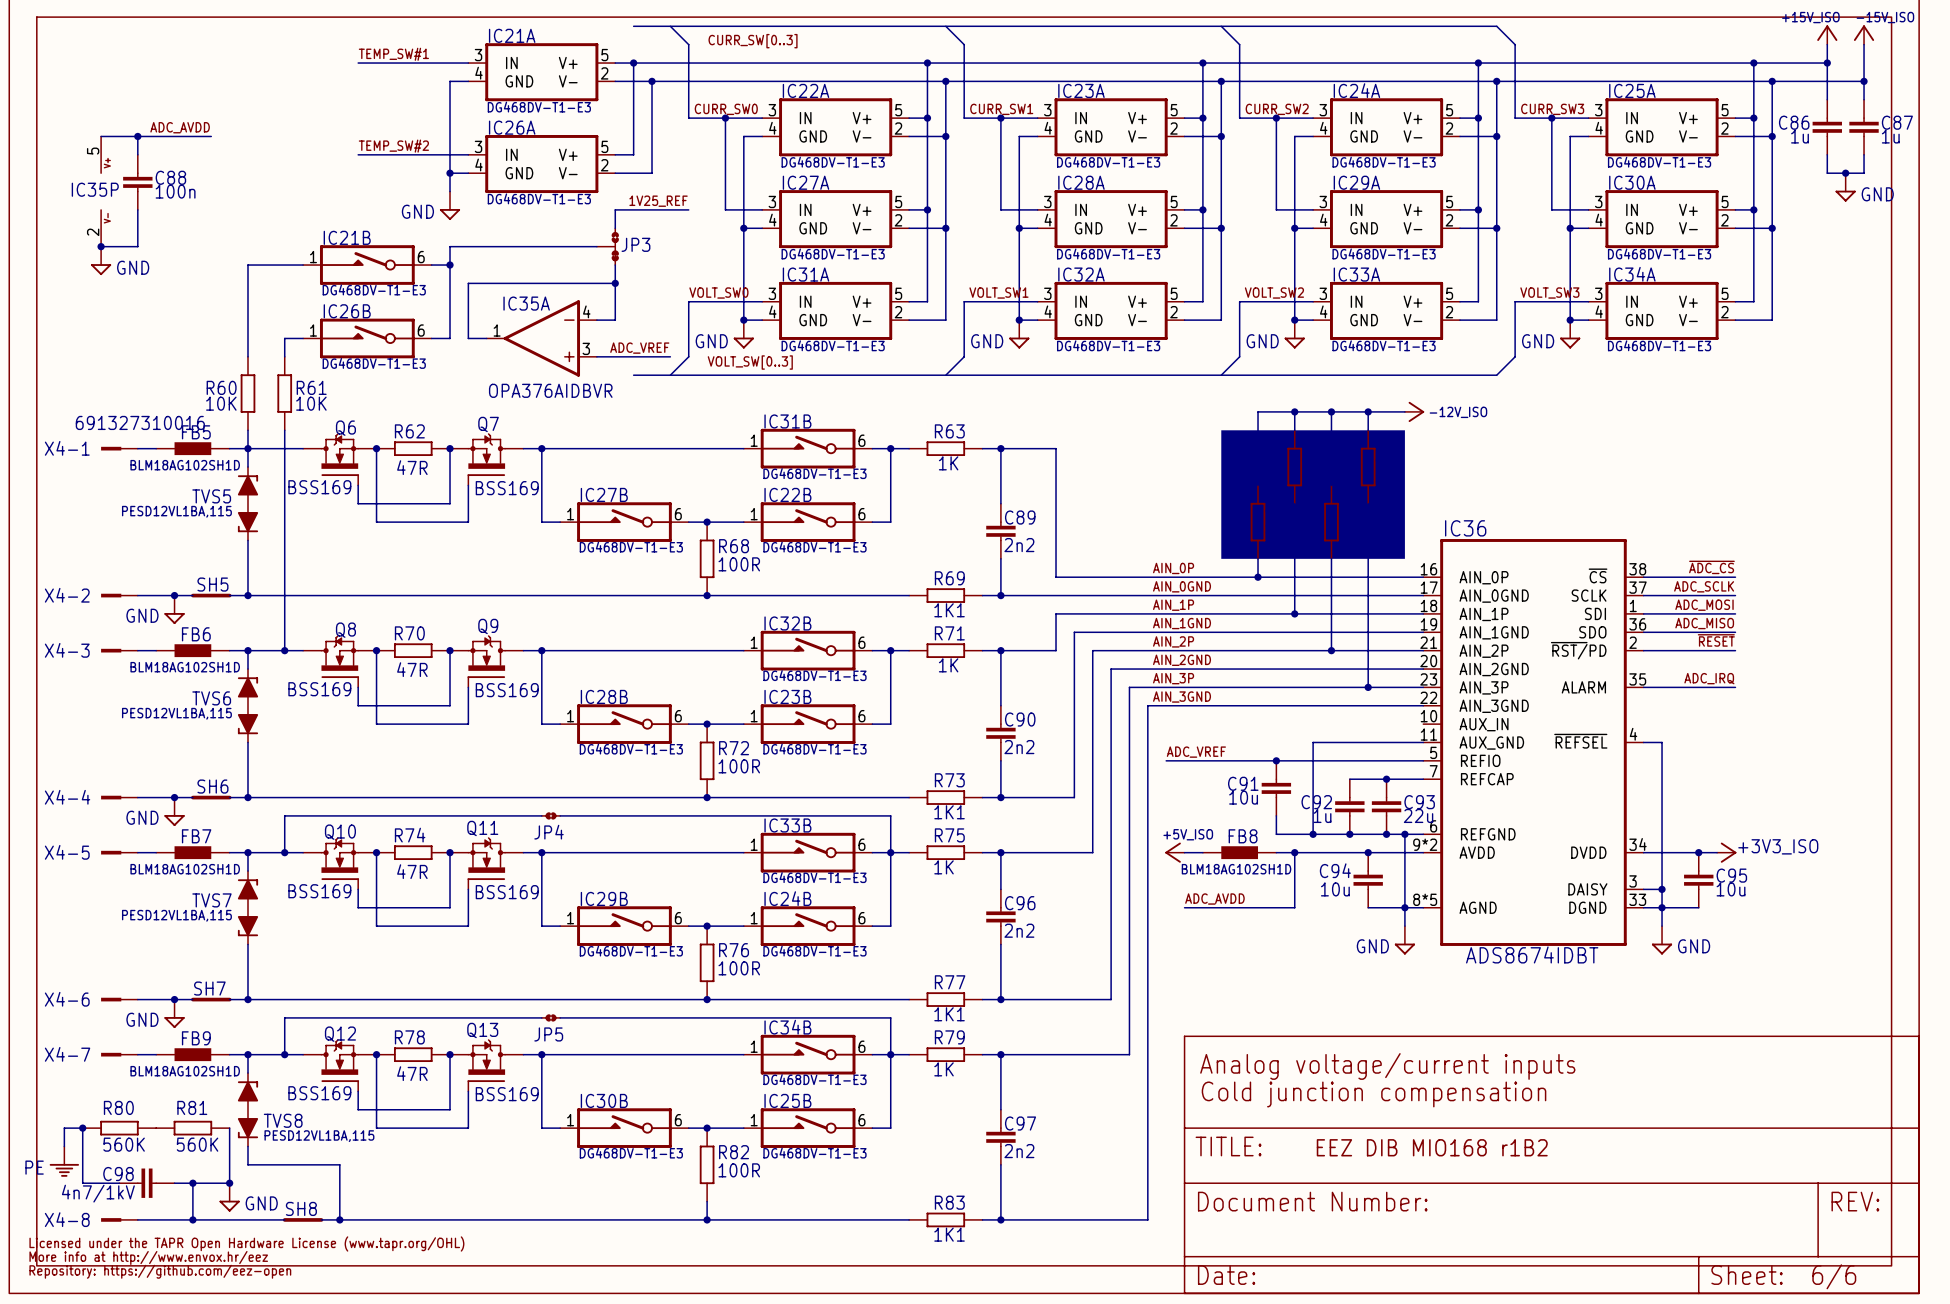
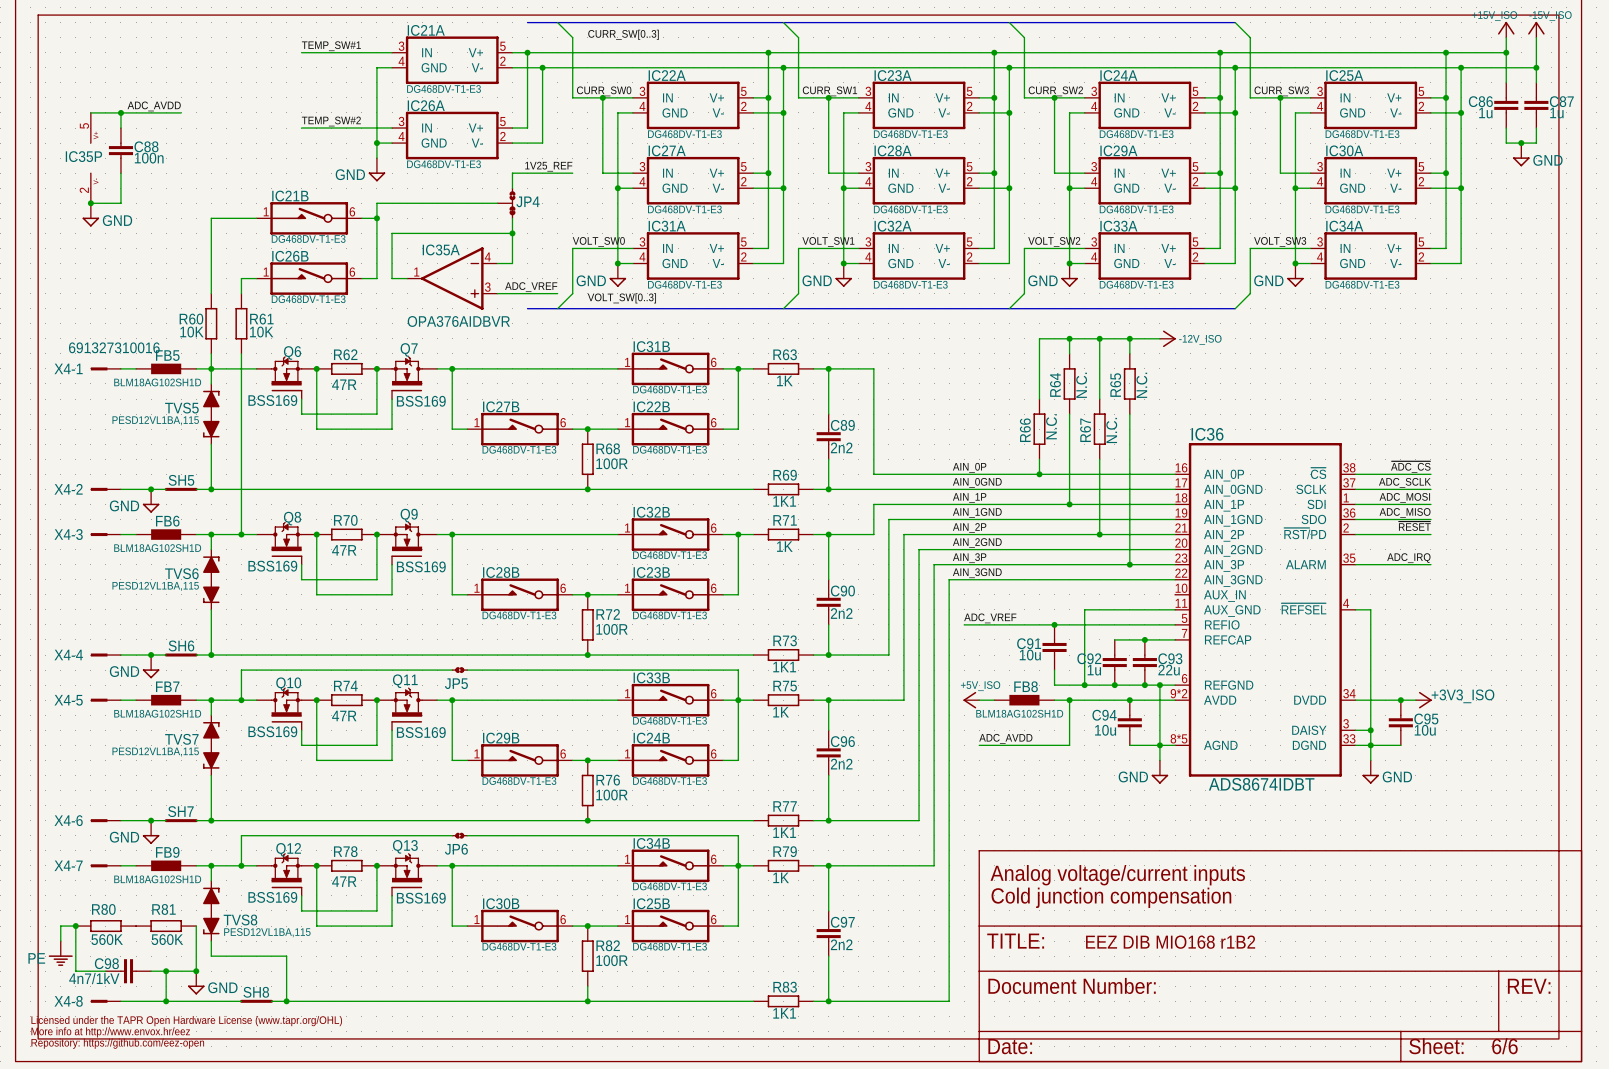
JP3 name: JP3 (635, 244) -> JP4 (528, 201)
drawing: [1221, 430, 1405, 559] -> none
JP4 name: JP4 (549, 832) -> JP5 (456, 683)
JP5 name: JP5 (548, 1034) -> JP6 (456, 849)

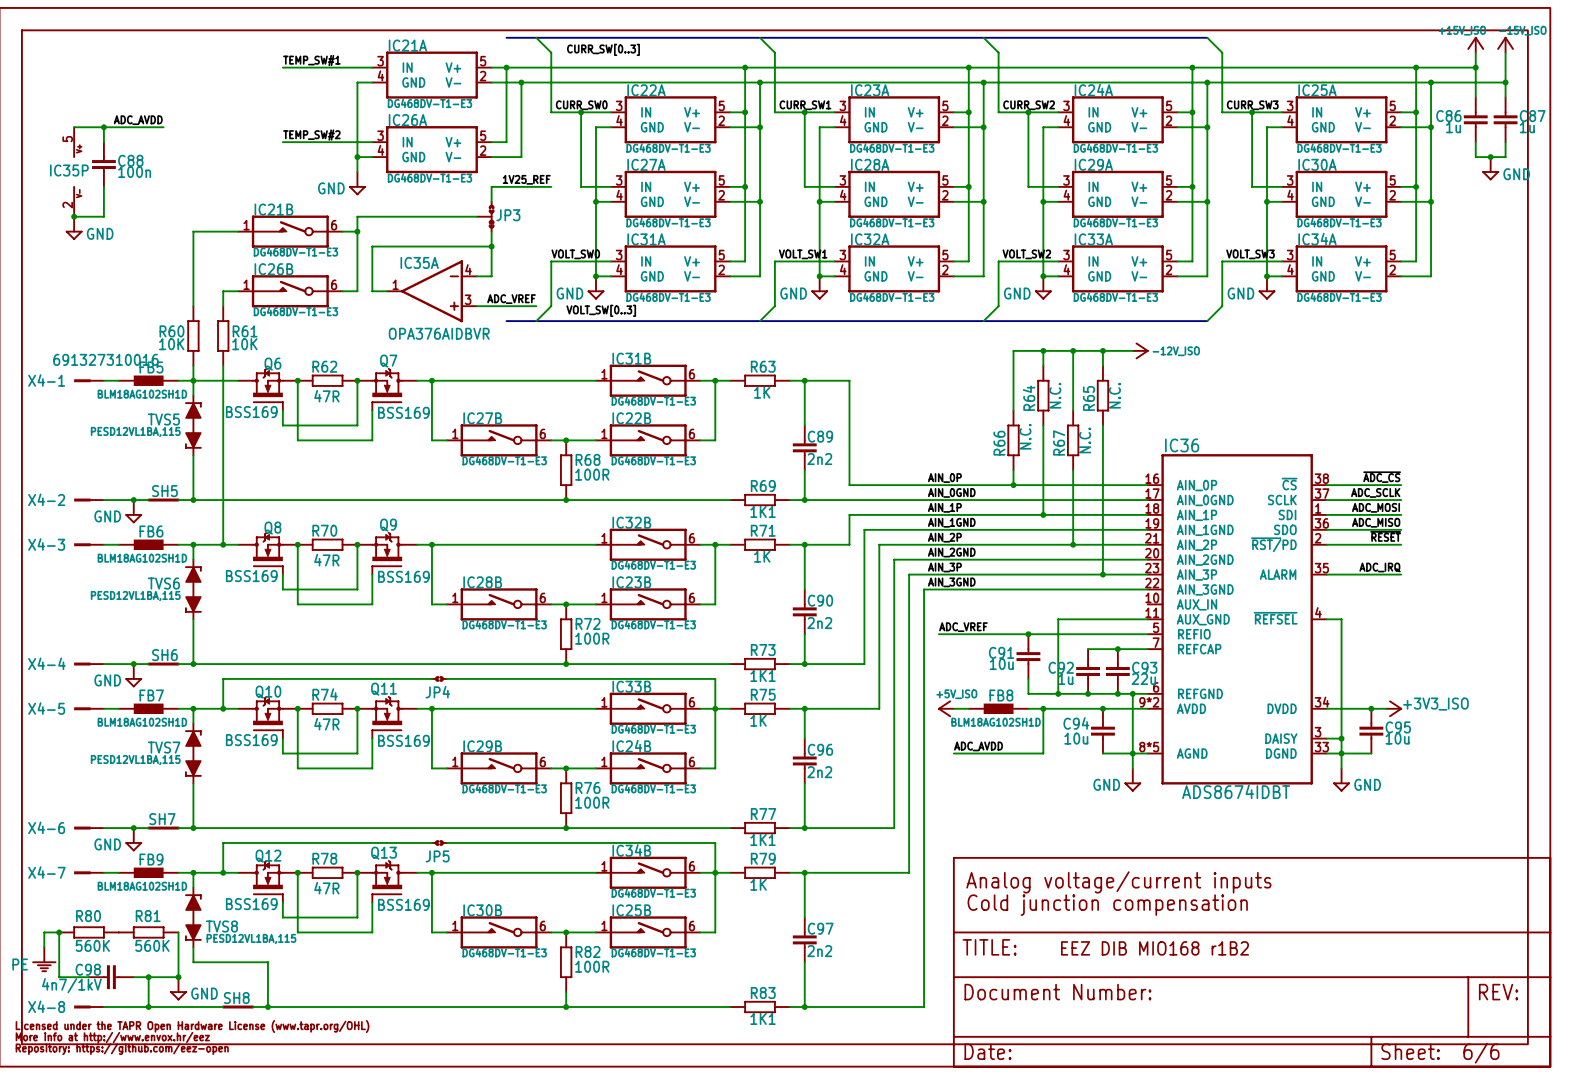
JP4 name: JP4 (528, 201) -> JP3 (508, 215)
JP5 name: JP5 (456, 683) -> JP4 (437, 692)
JP6 name: JP6 (456, 849) -> JP5 (437, 856)

